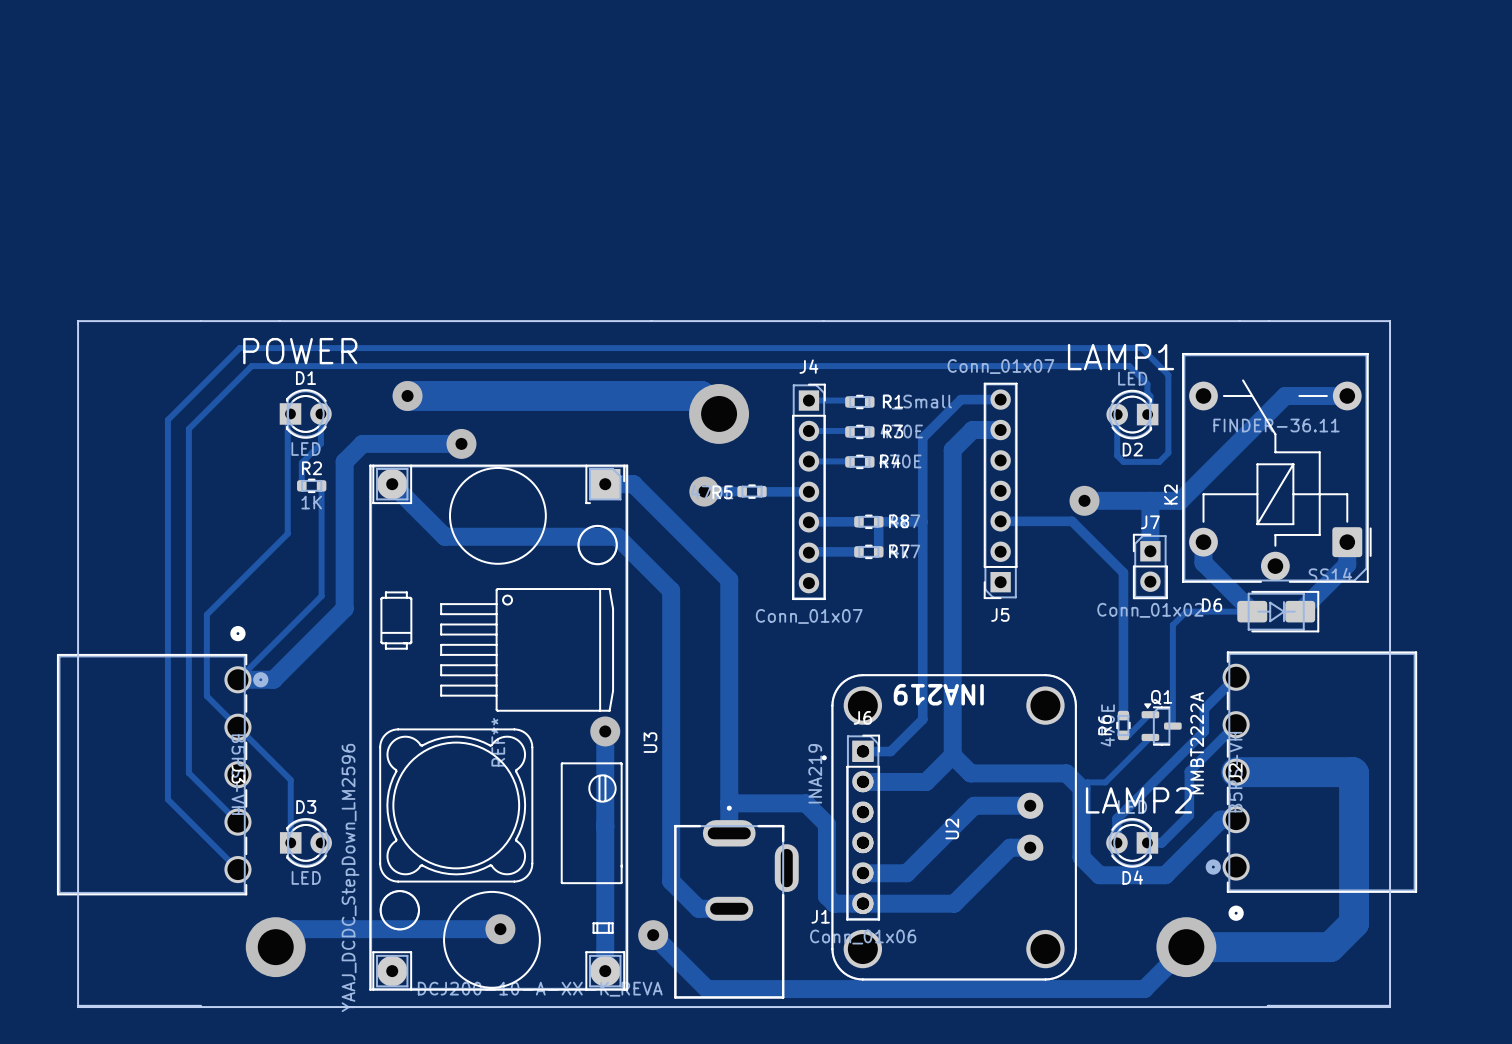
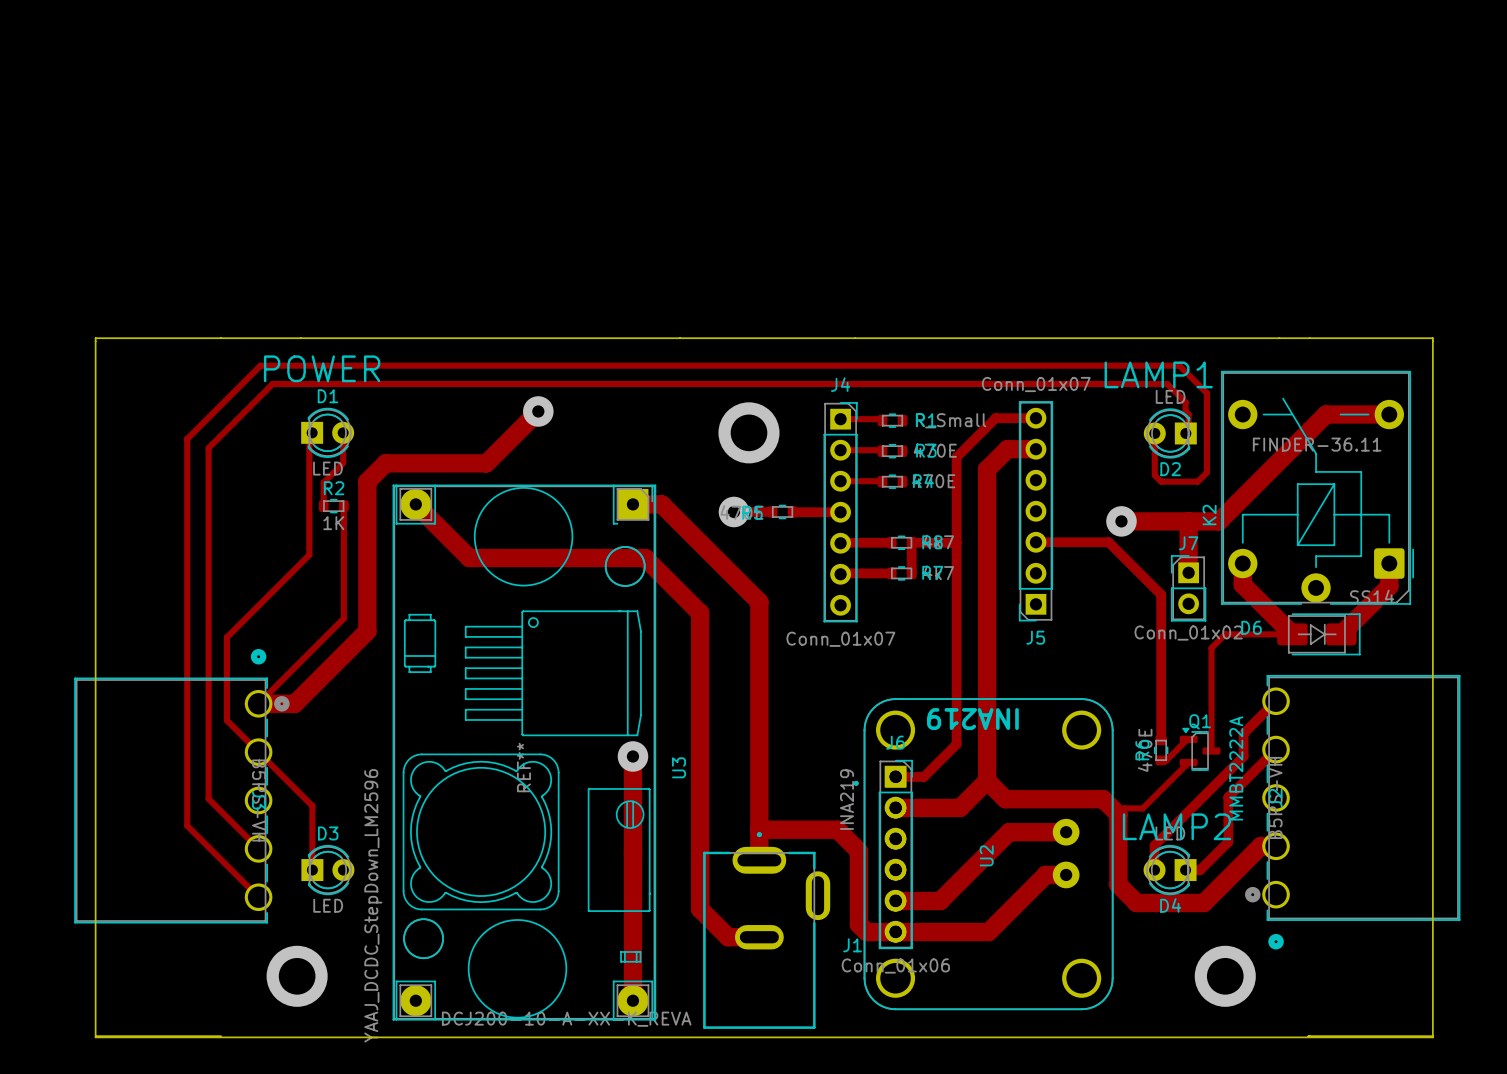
track: none -> (538, 411) (486, 463)
via: none -> (538, 411)
track: (407, 395) (701, 395) (719, 413) -> none
via: (407, 395) -> none
via: (461, 443) -> none
track: (1236, 772) (1354, 773) (1354, 923) (1330, 947) (1186, 947) (1144, 989) (707, 989) (653, 935) -> none
track: (500, 929) (293, 929) (275, 947) -> none
via: (500, 929) -> none
via: (653, 935) -> none

